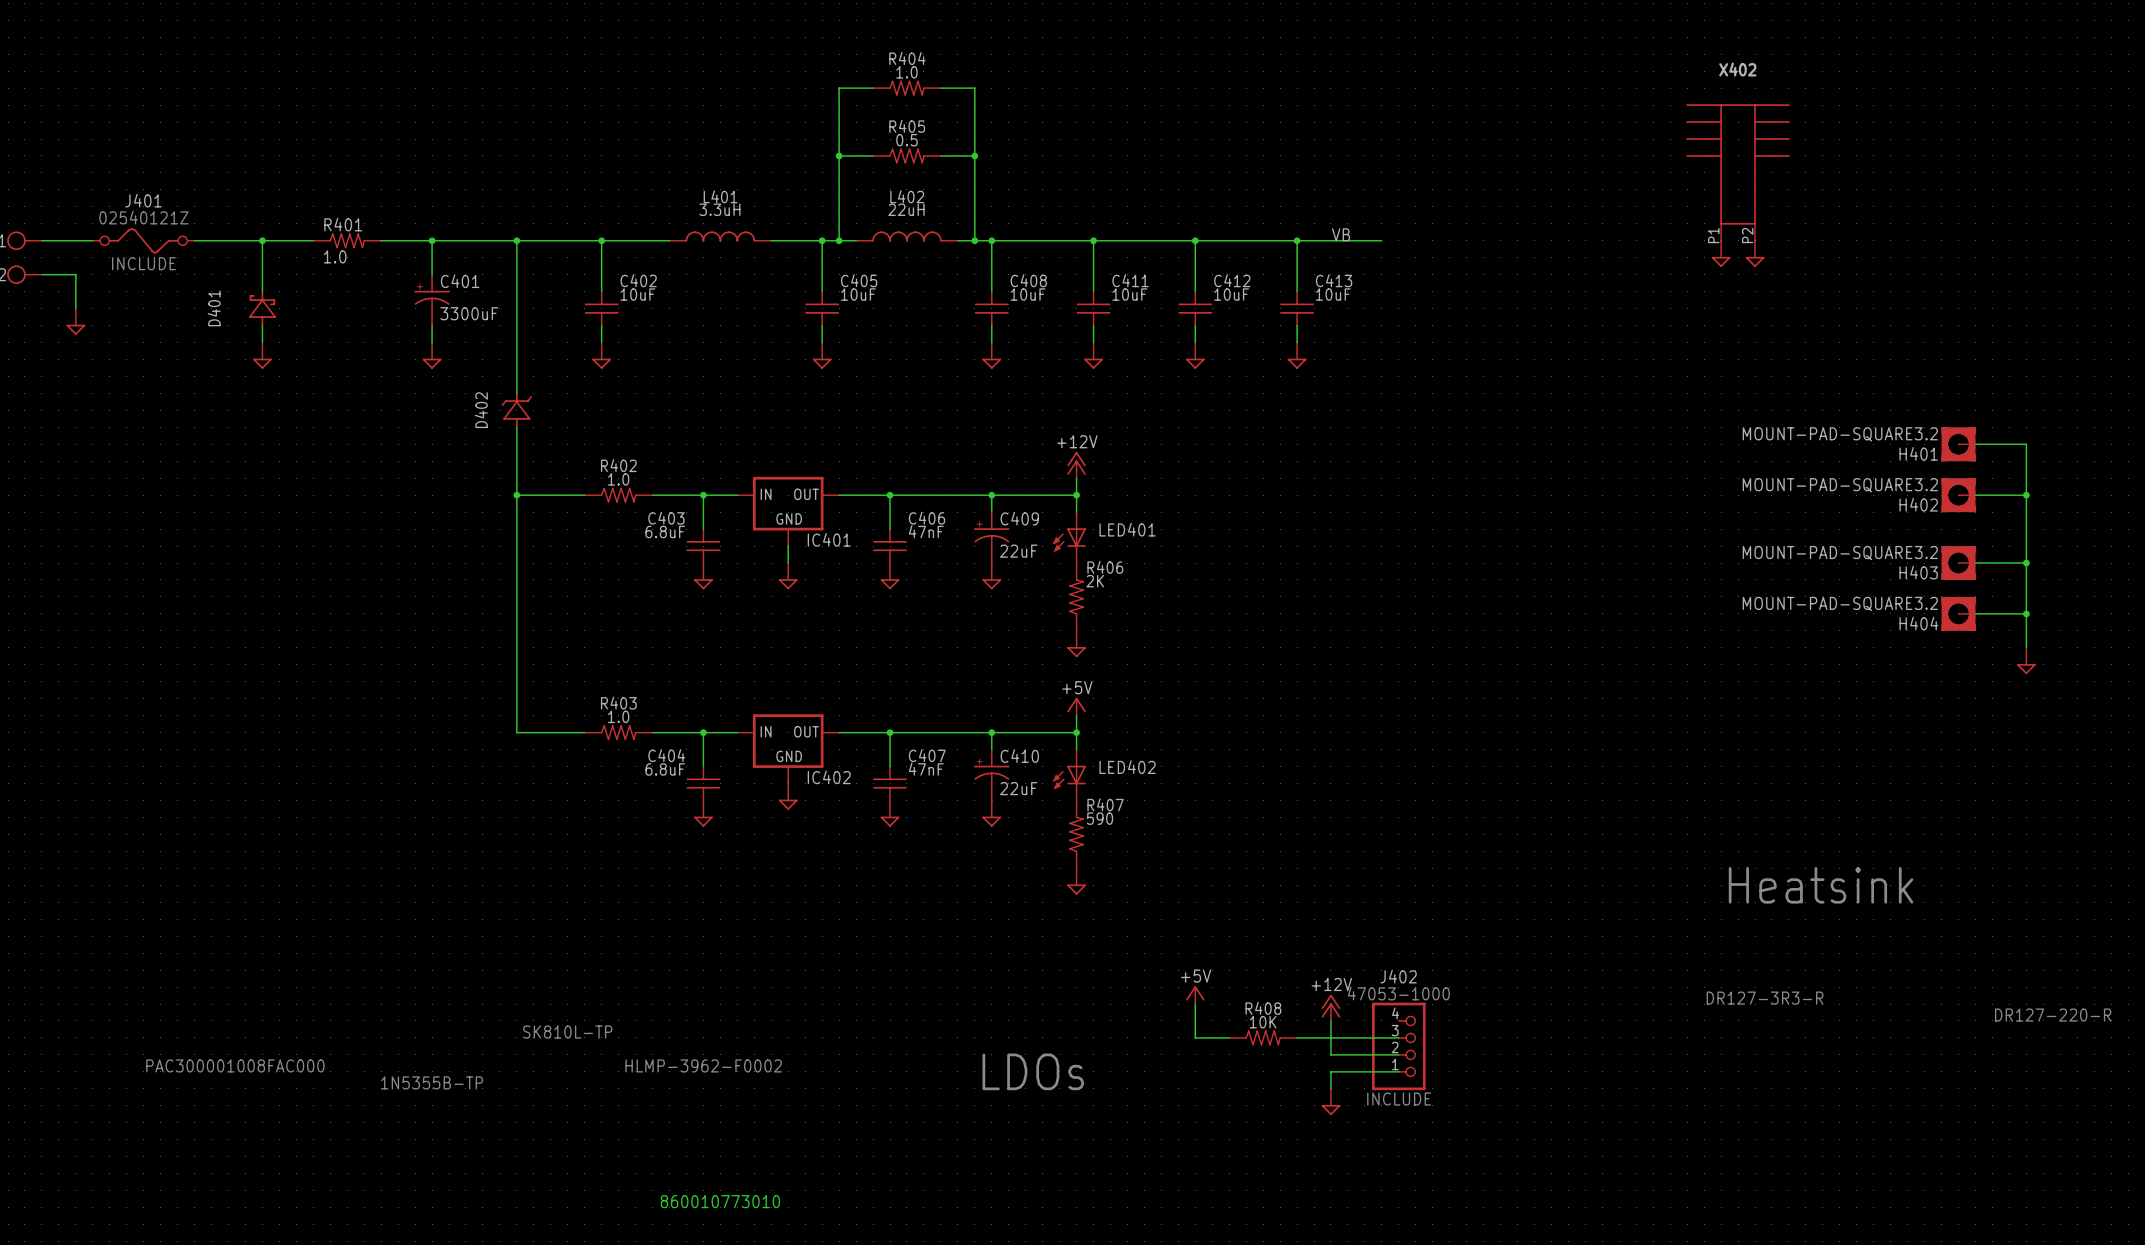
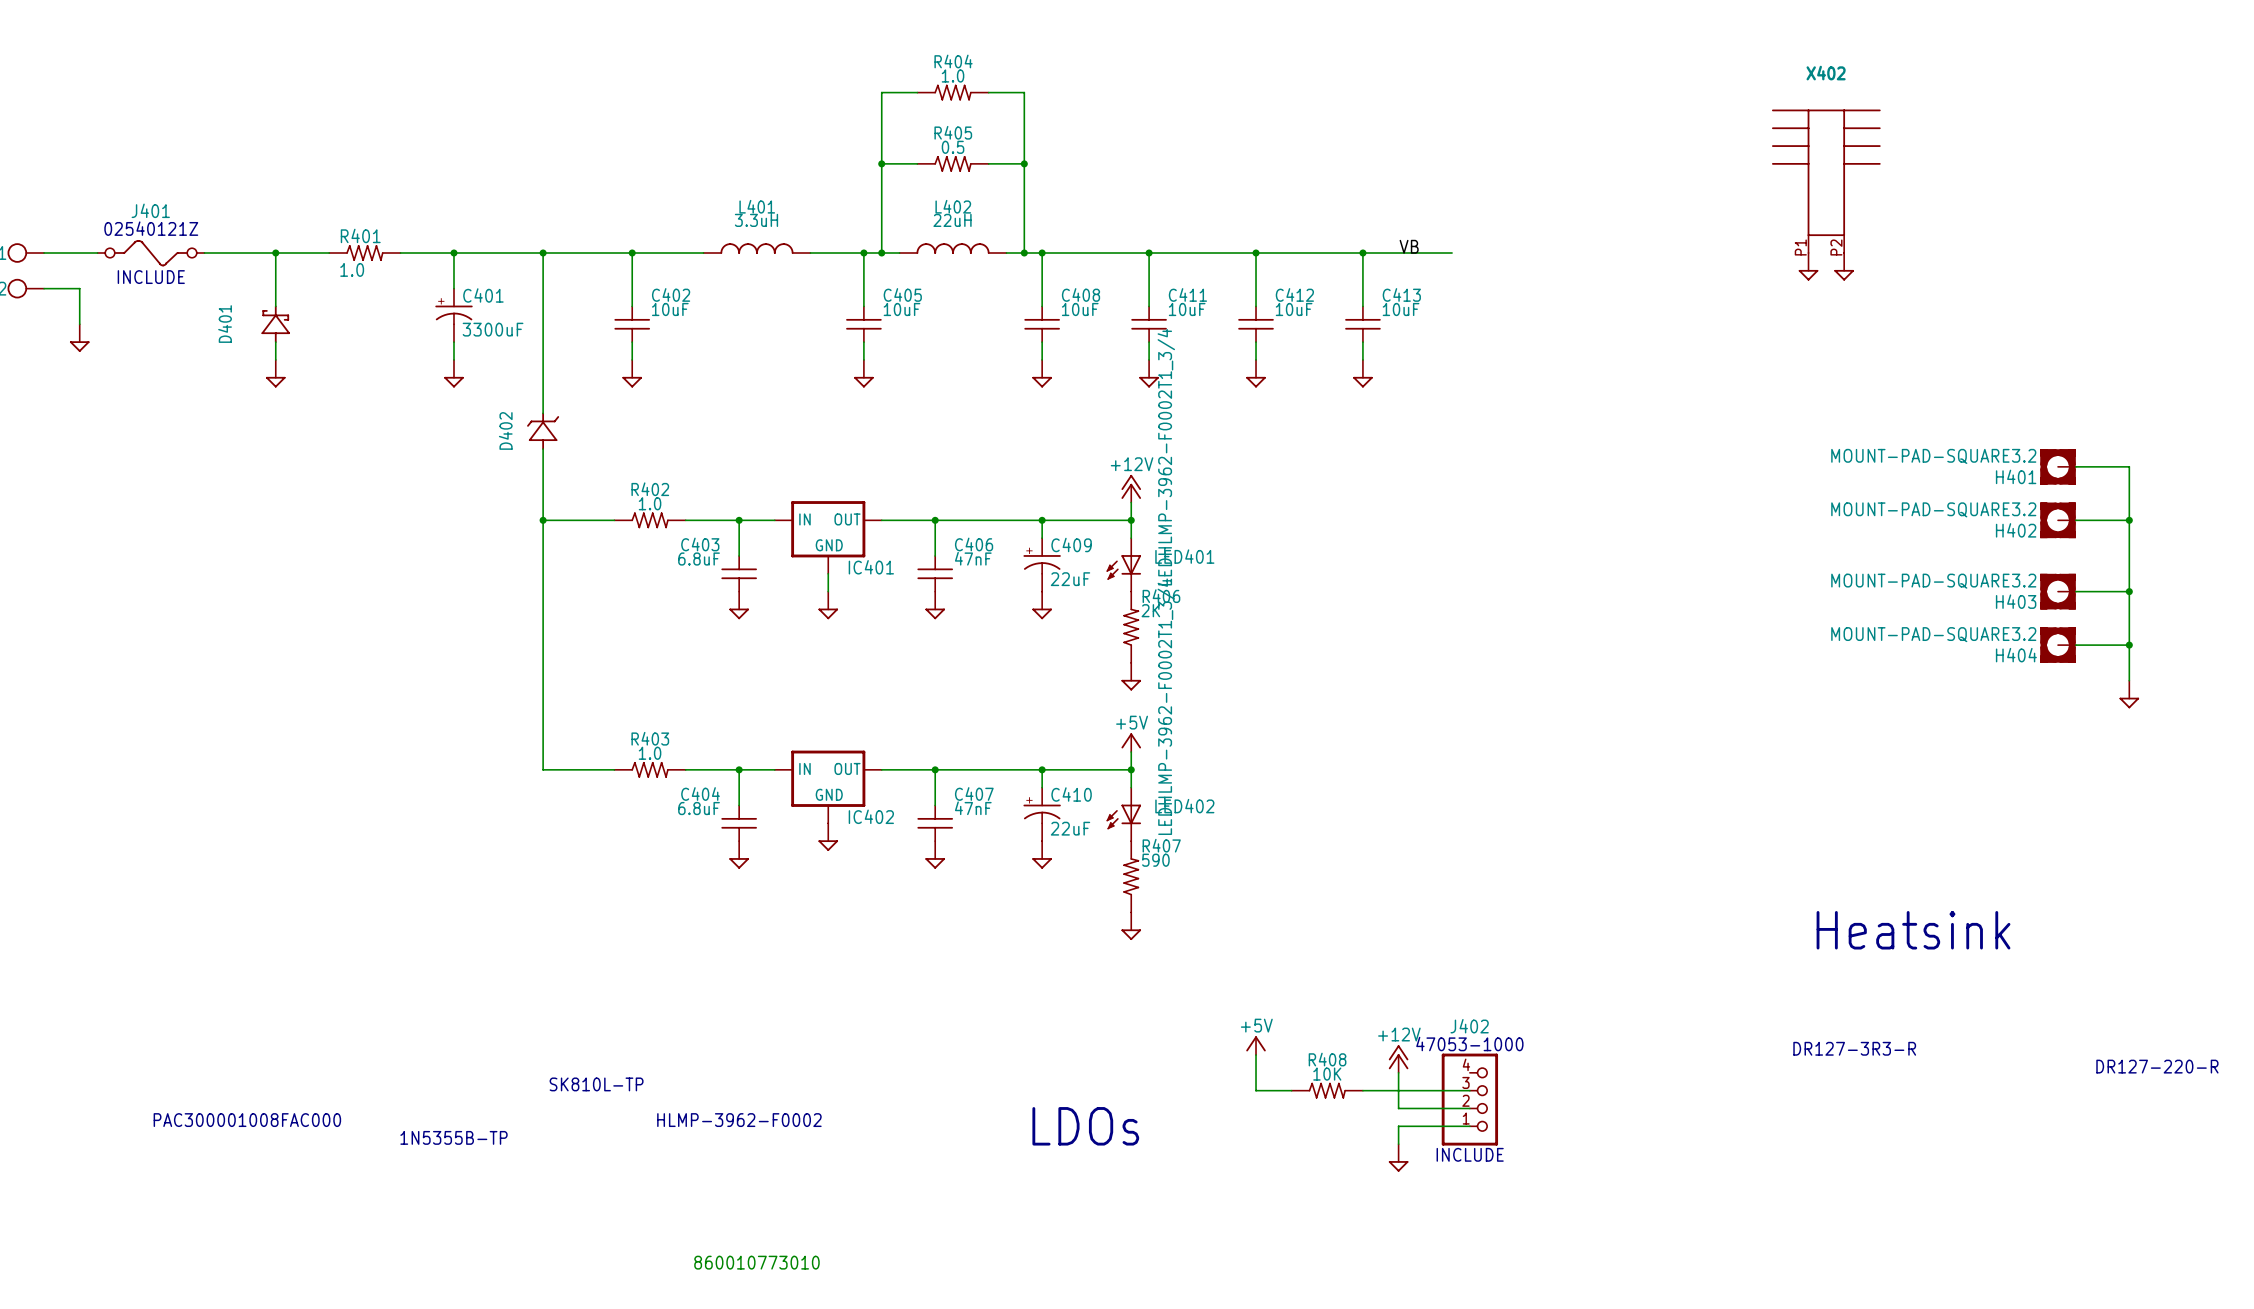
LED401 value: none -> LEDHLMP-3962-F0002T1_3/4 (1166, 457)
LED402 value: none -> LEDHLMP-3962-F0002T1_3/4 (1166, 706)

